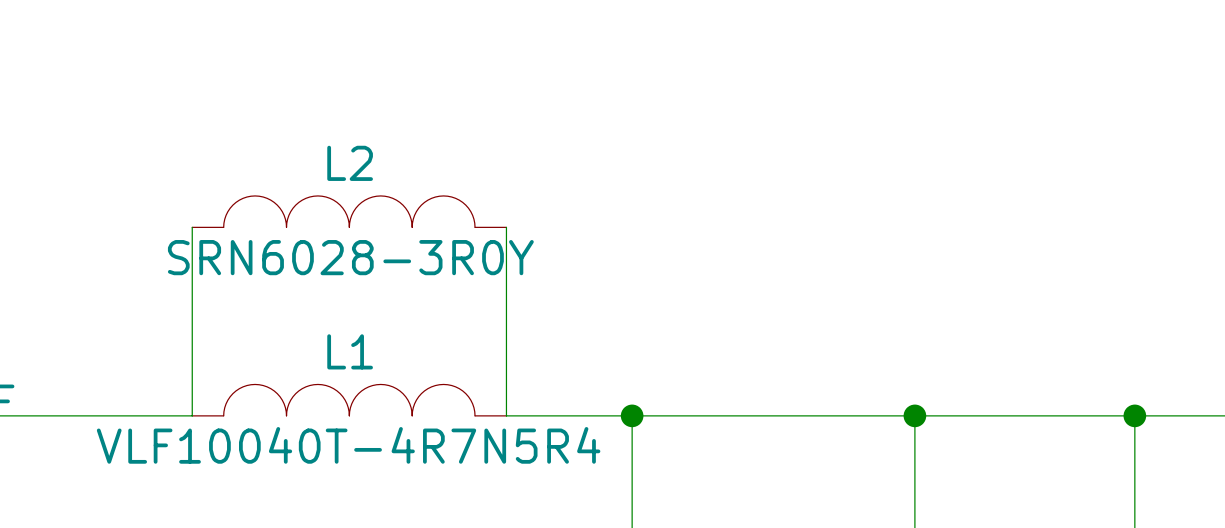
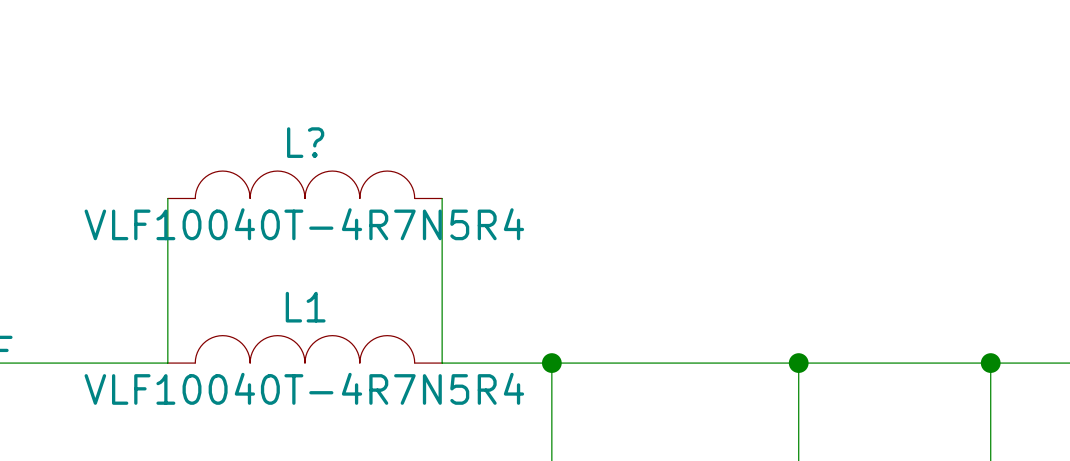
L2 name: L2 (350, 163) -> L? (305, 142)
L2 value: SRN6028-3R0Y (350, 257) -> VLF10040T-4R7N5R4 (304, 224)

